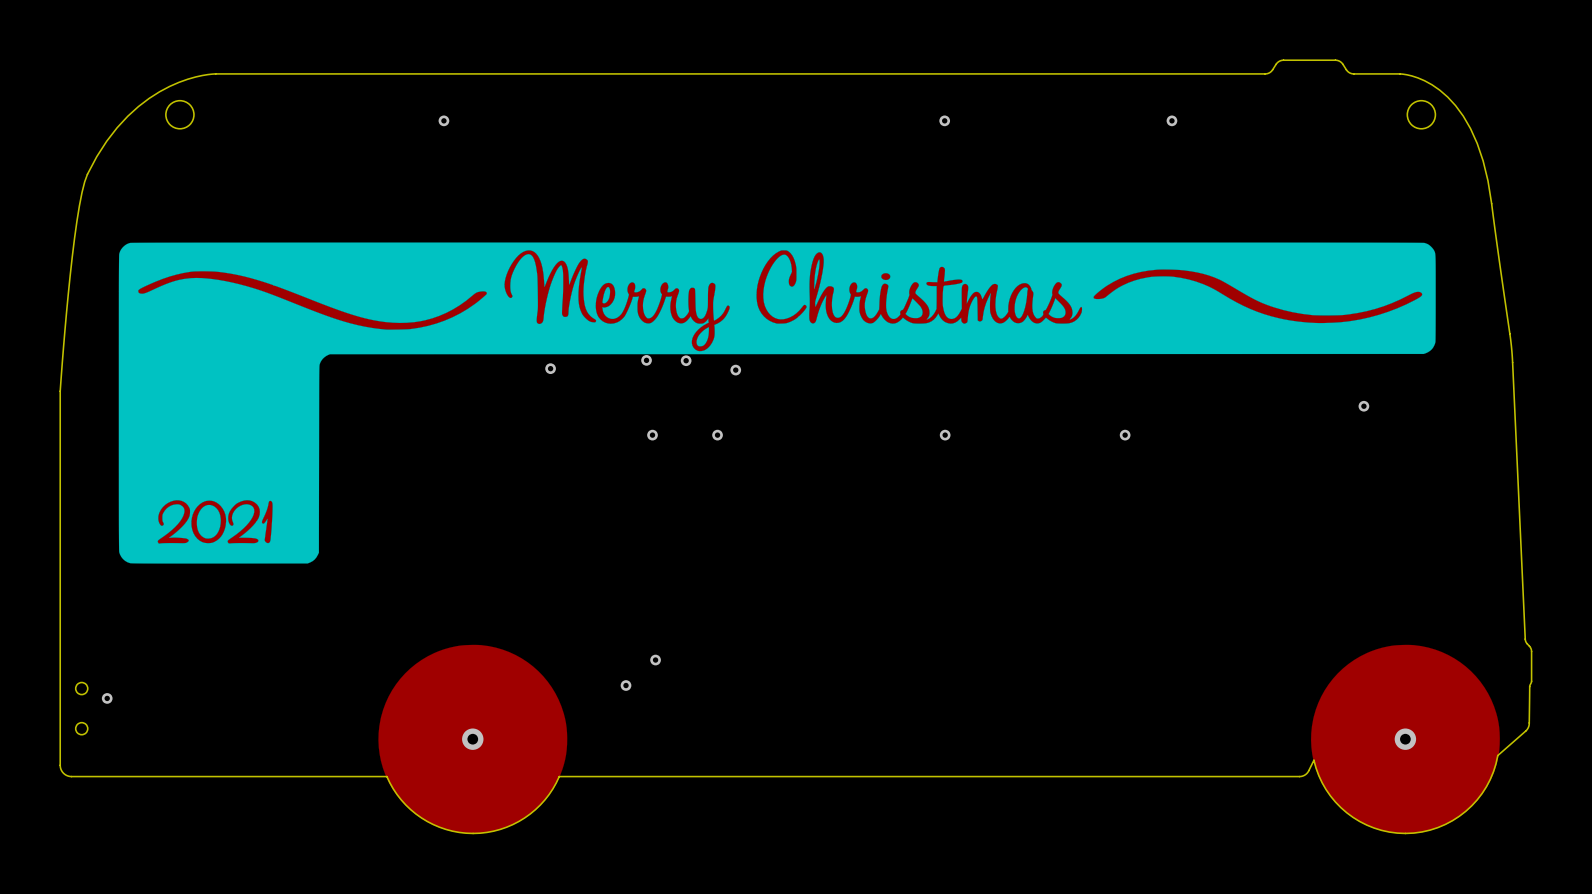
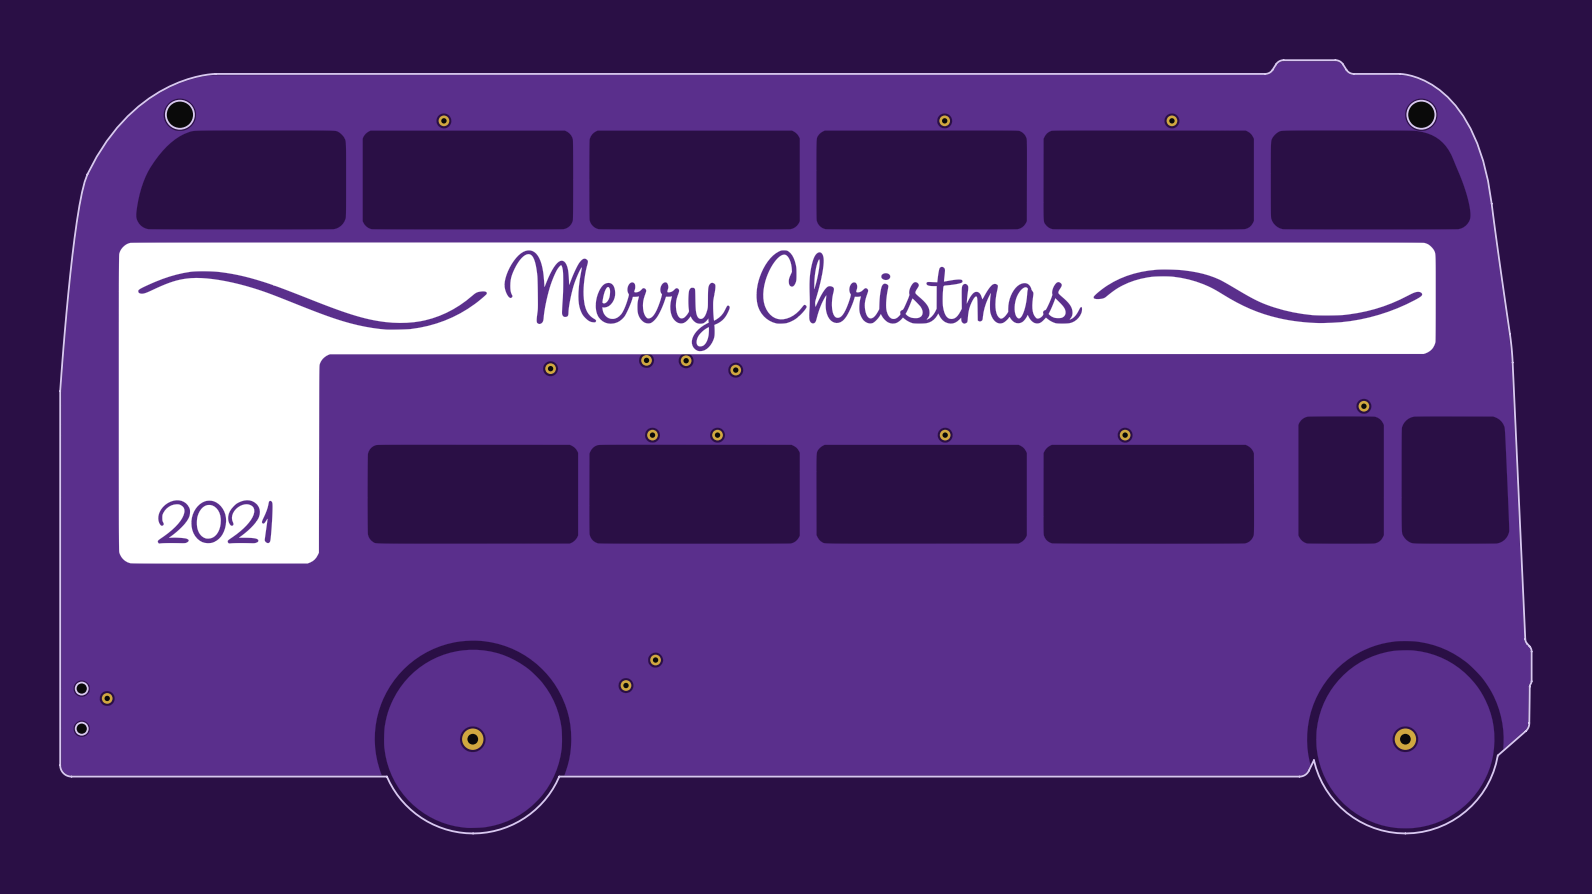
drawing: none -> [61, 61, 1531, 829]
drawing: [378, 644, 568, 834] -> none
drawing: [1311, 644, 1500, 834] -> none

